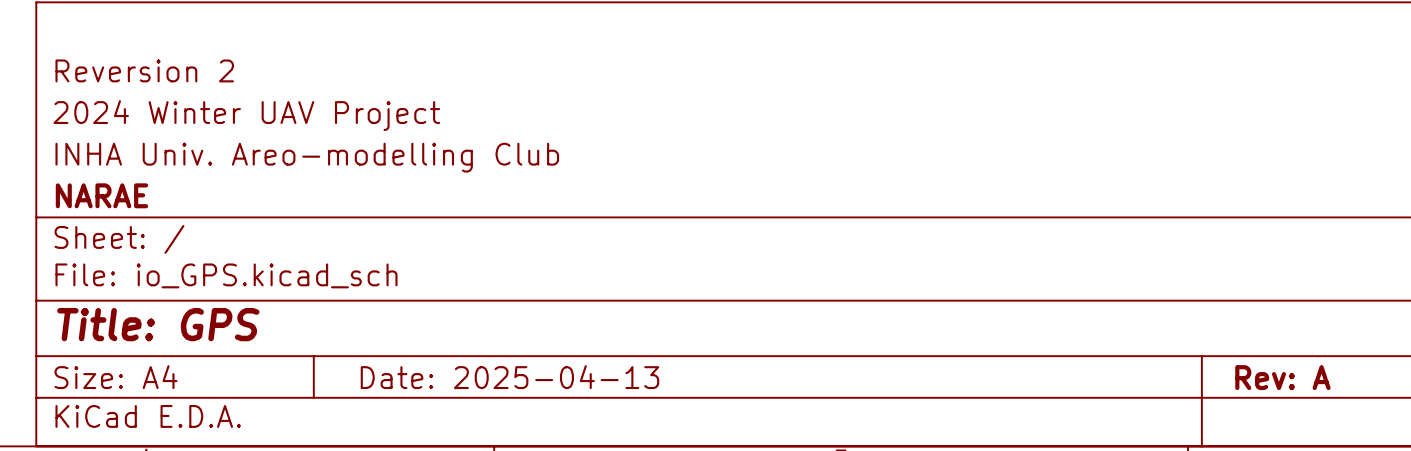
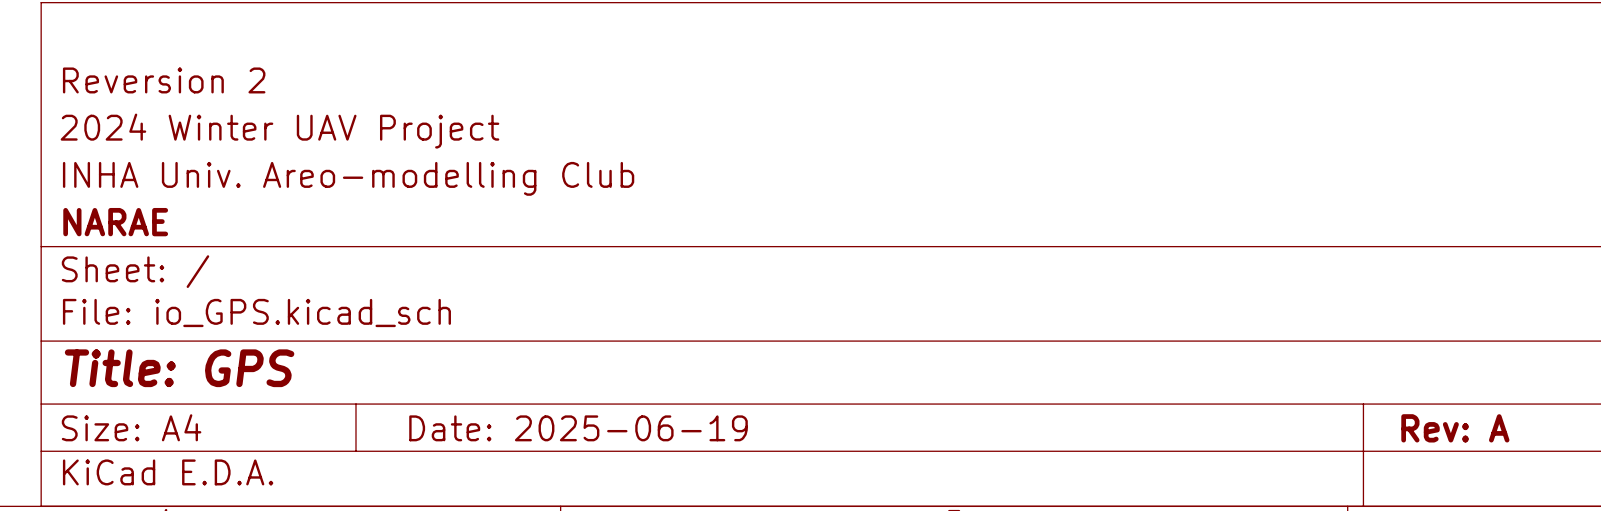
title block: Date: 2025-04-13 (509, 377) -> Date: 2025-06-19 (578, 428)

